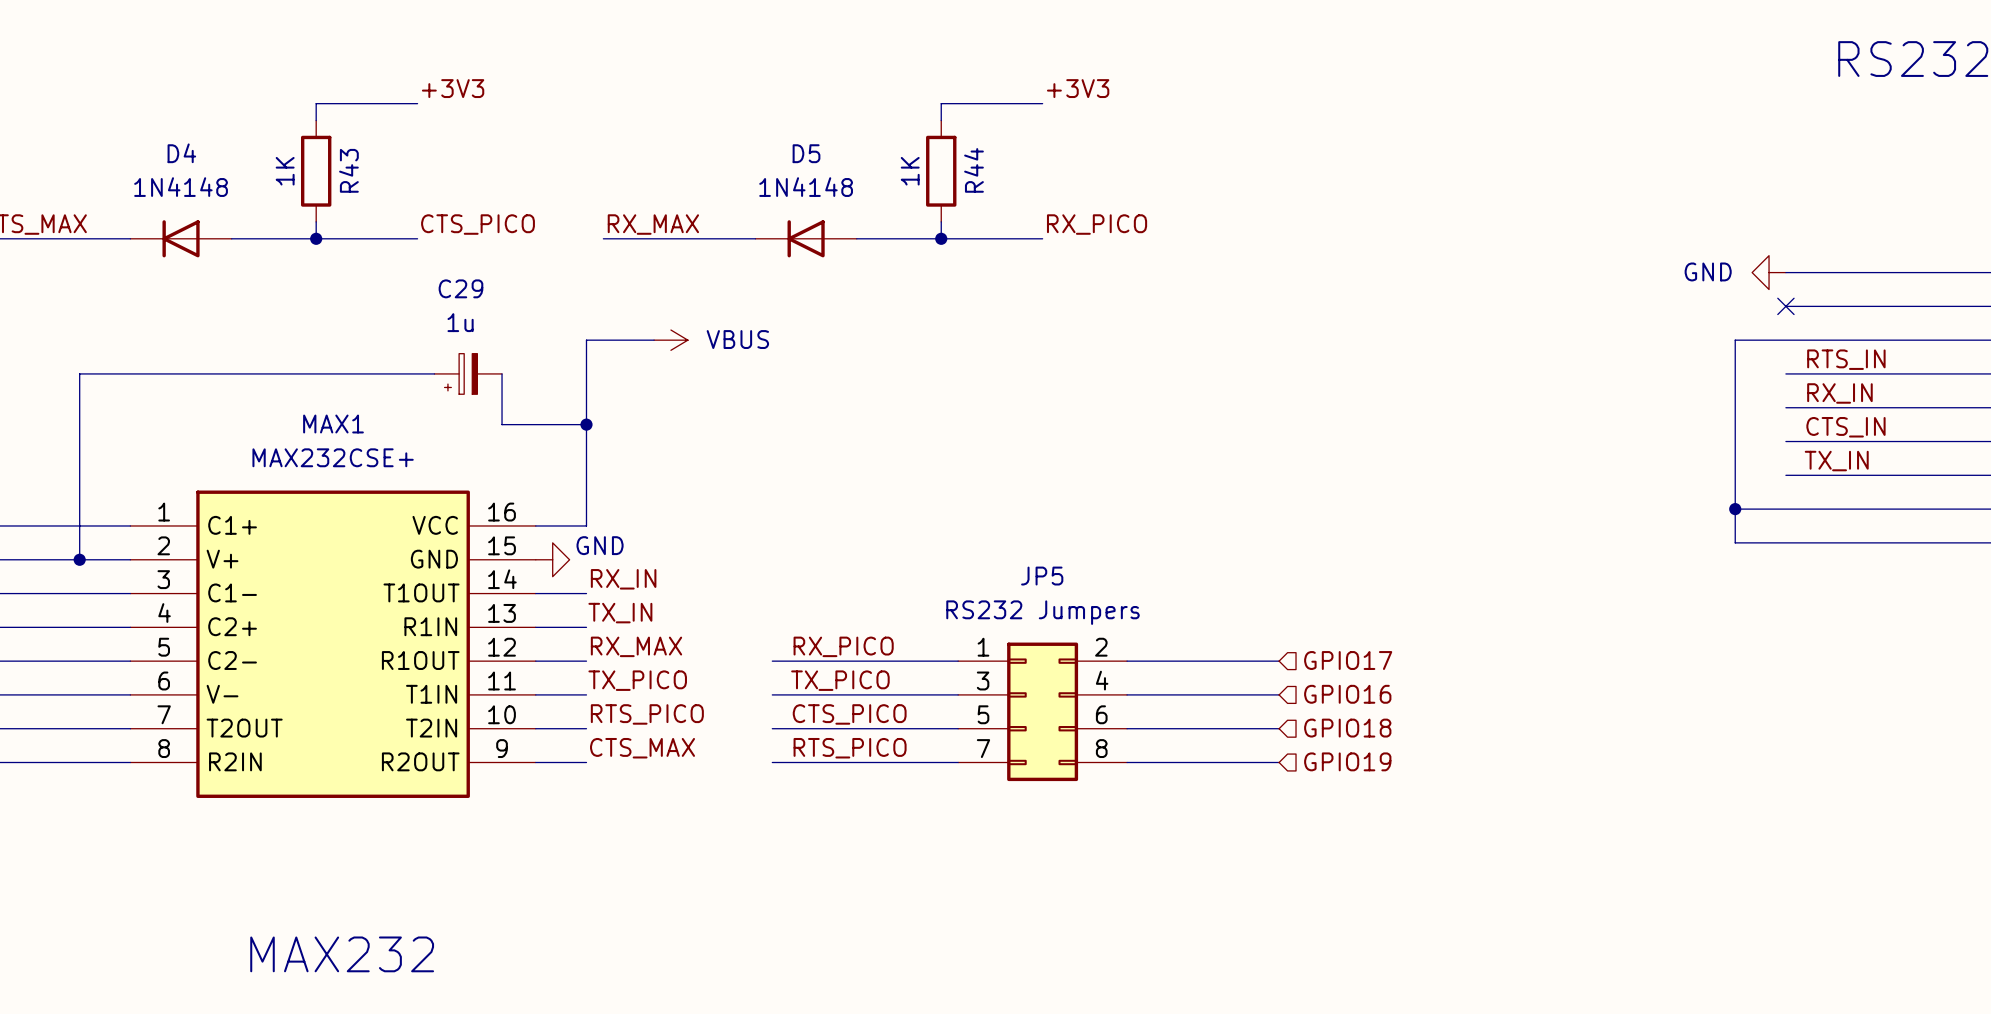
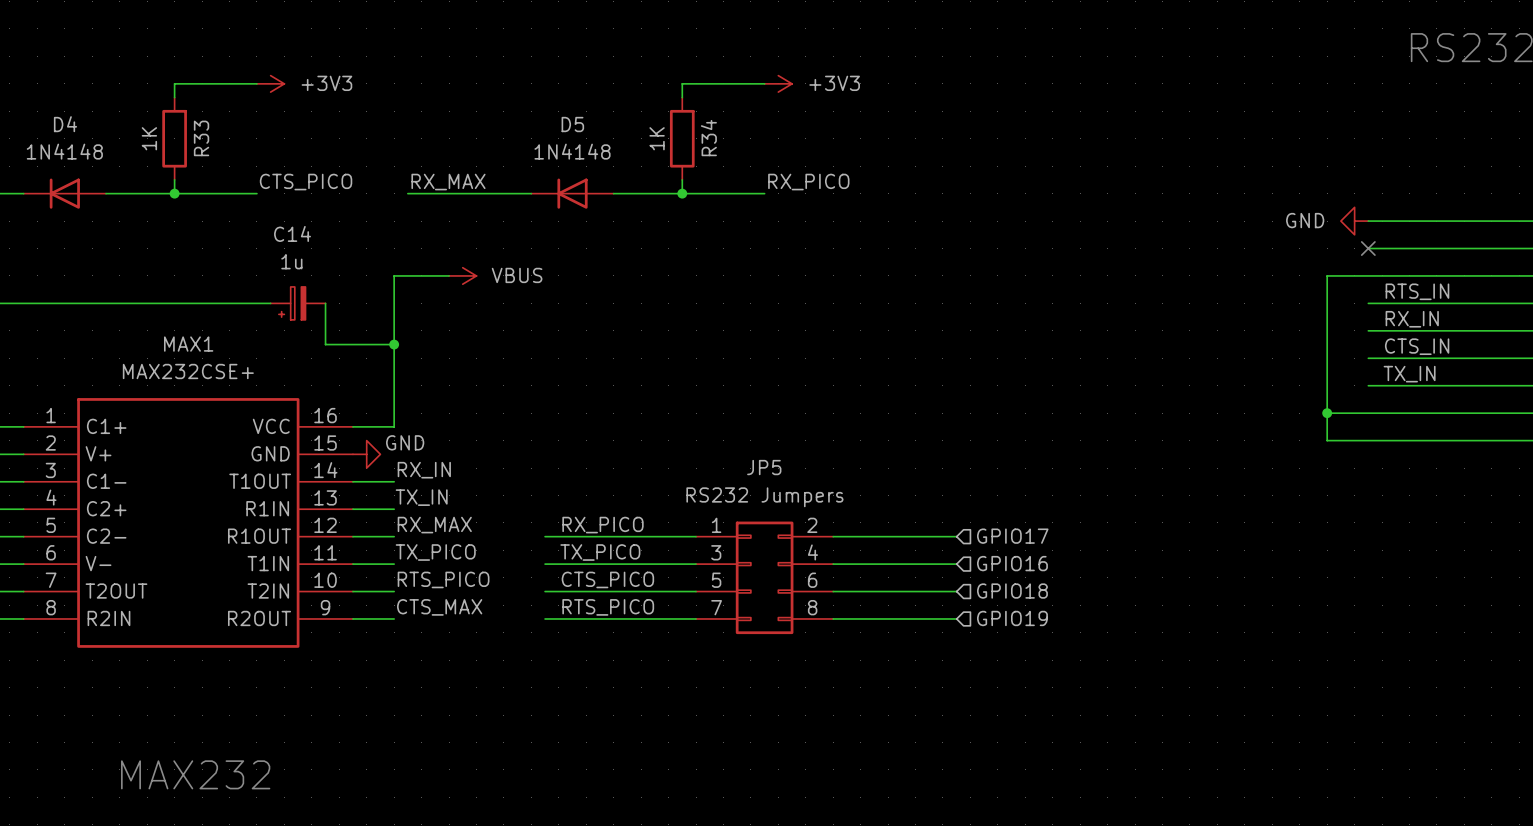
label: +3V3 (453, 88) -> none
label: +3V3 (1078, 88) -> none
power symbol: none -> +3V3 (270, 83)
power symbol: none -> +3V3 (778, 83)
R43 name: R43 (348, 170) -> R33 (201, 138)
R44 name: R44 (974, 170) -> R34 (708, 138)
C29 name: C29 (460, 288) -> C14 (292, 233)

